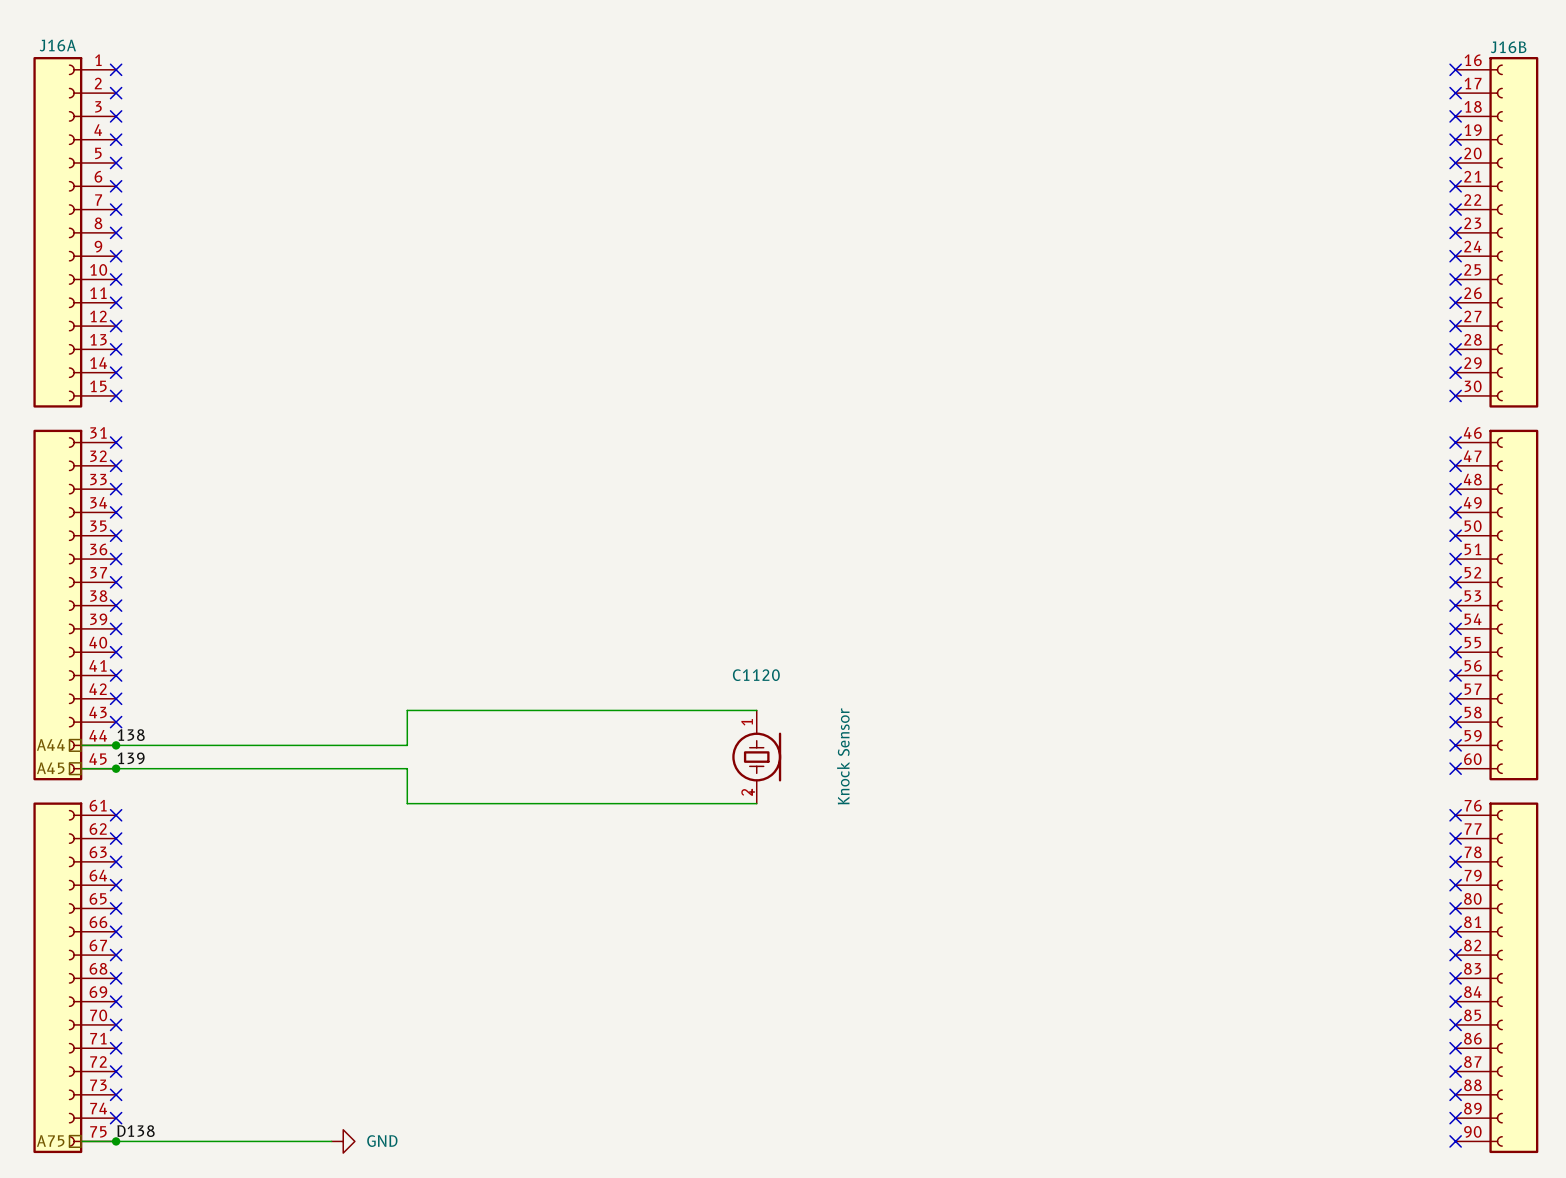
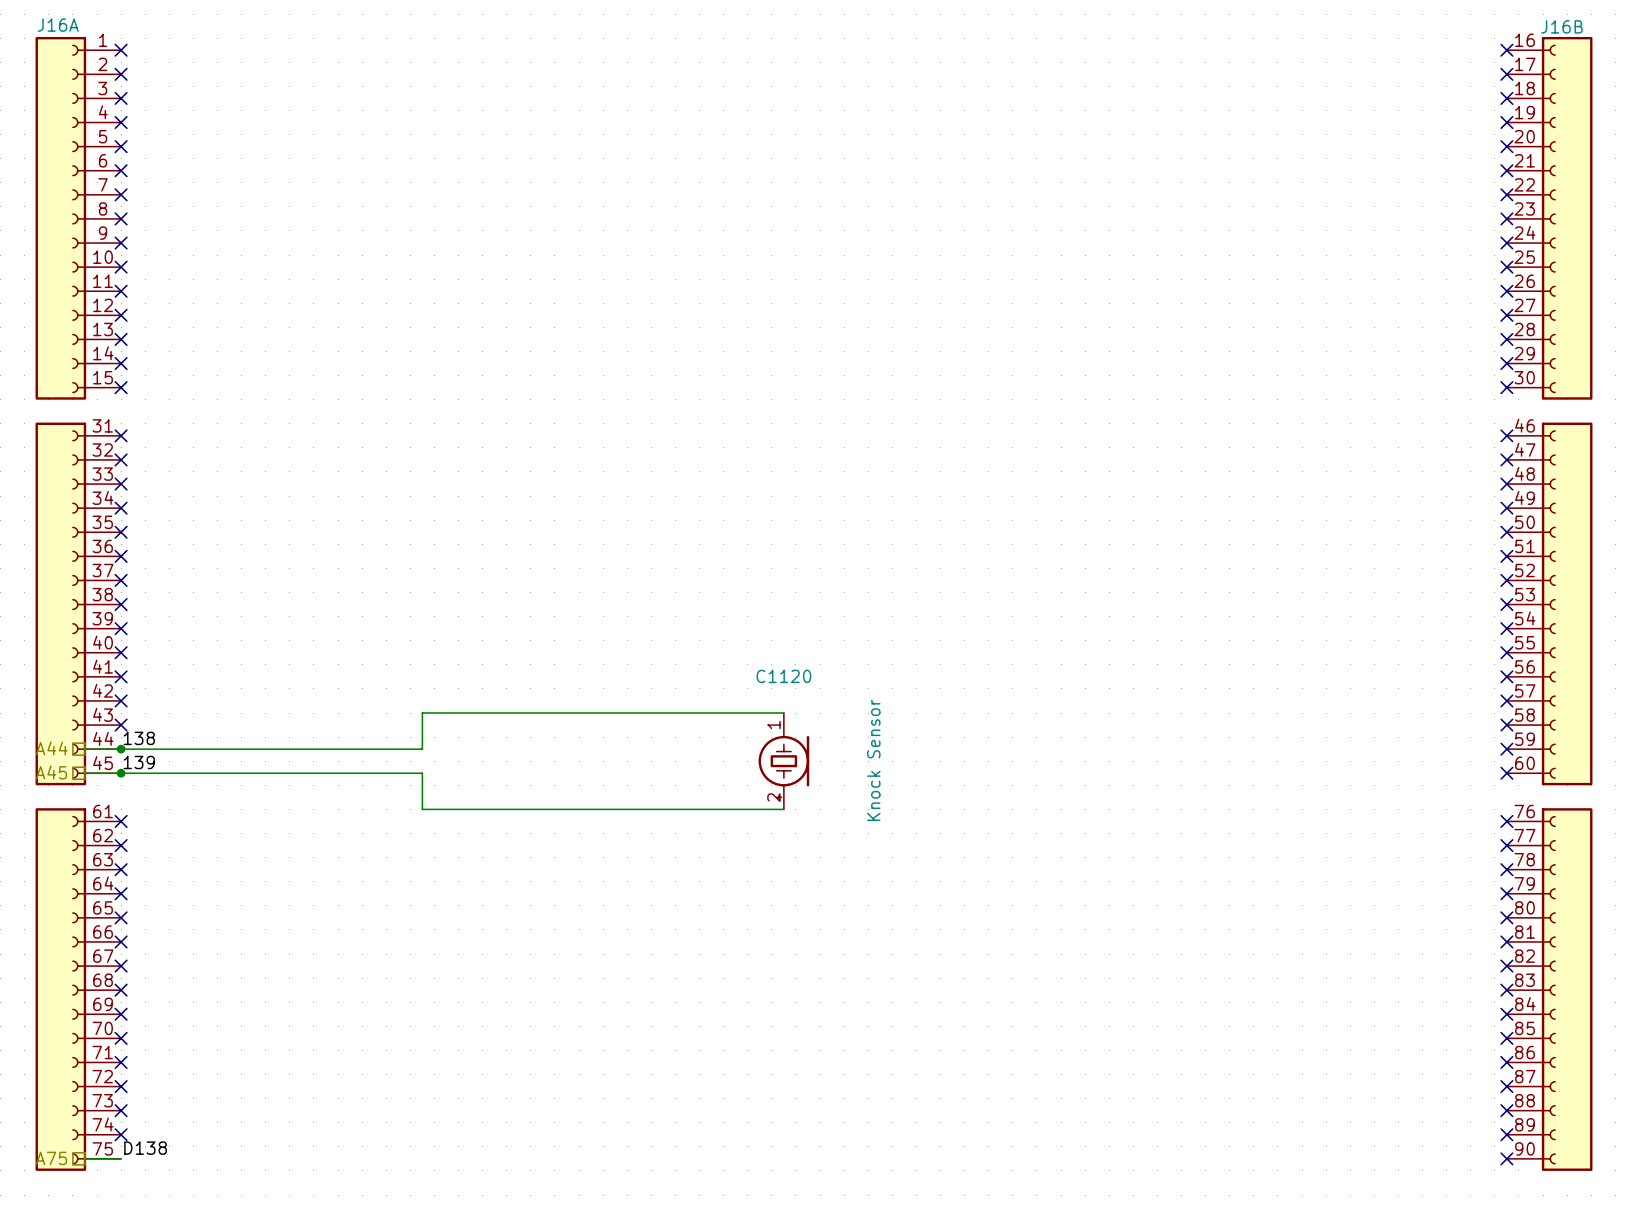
wire: (116, 1141) (331, 1141) -> none
junction: (116, 1141) -> none
power symbol: GND (343, 1141) -> none

